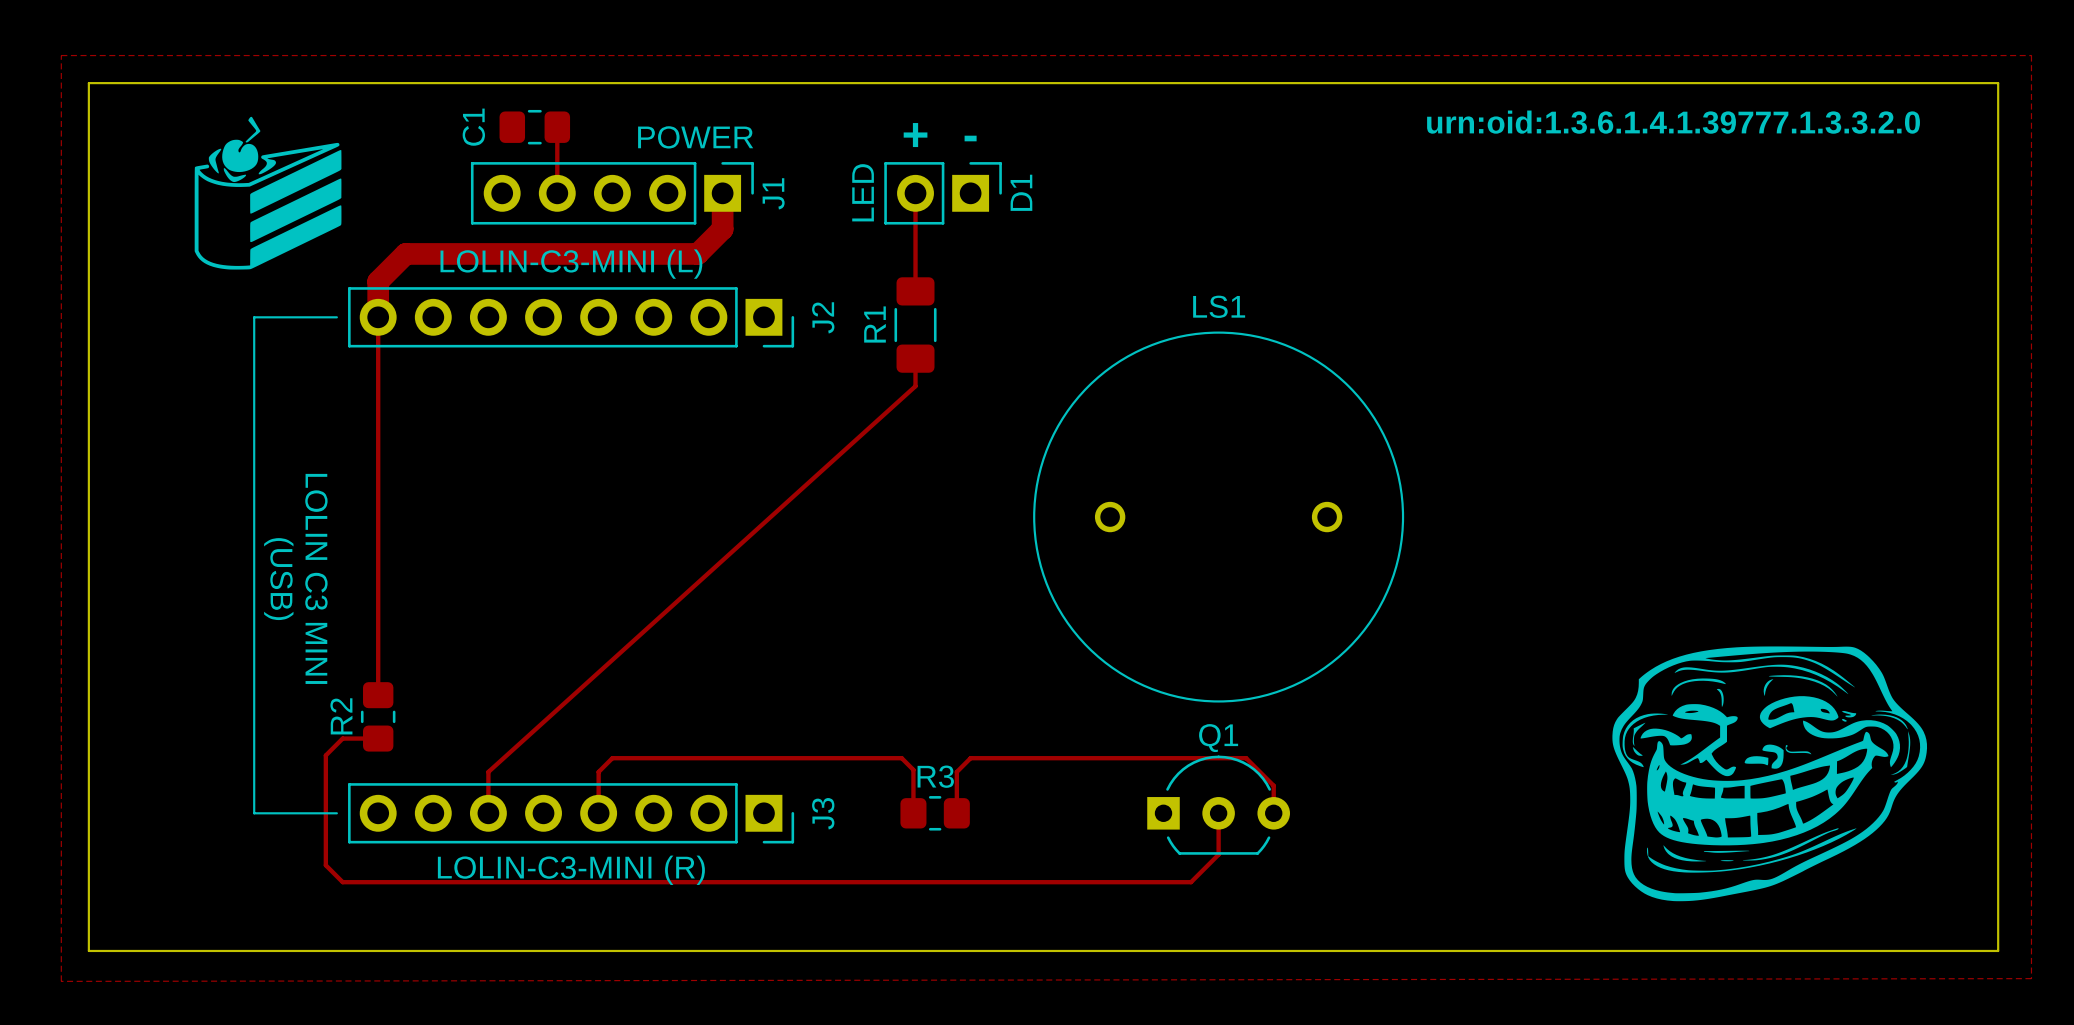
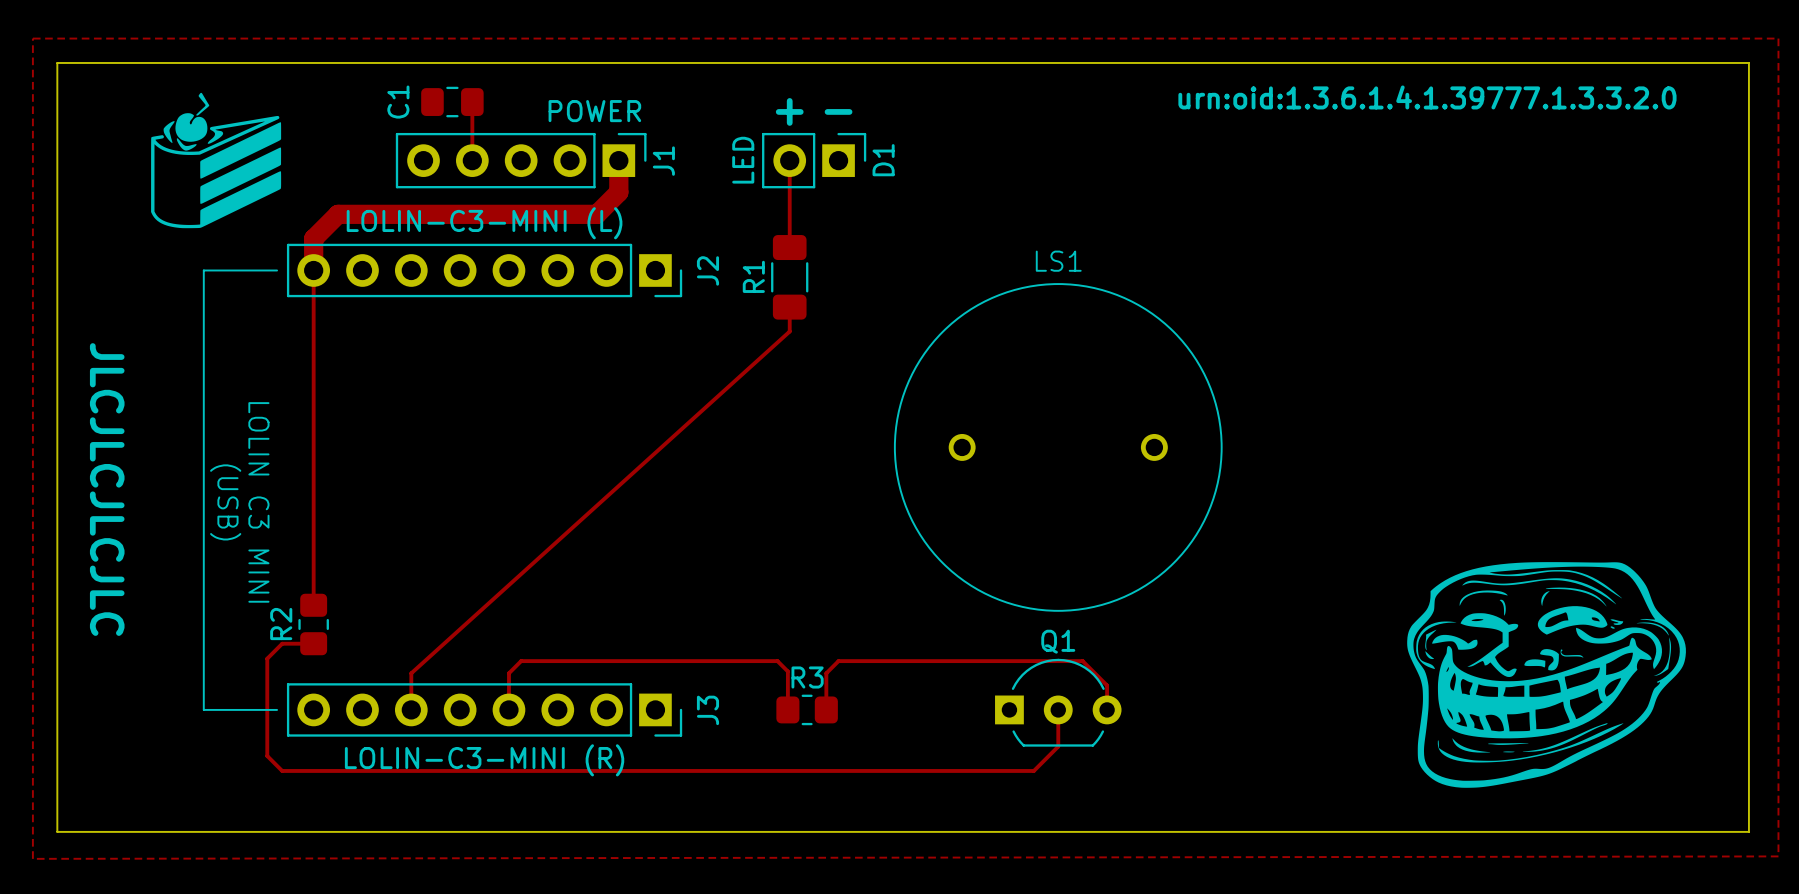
text: none -> JLCJLCJLCJLC (107, 489)

